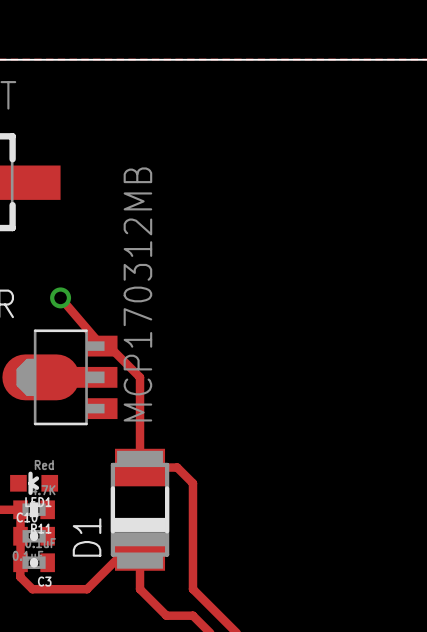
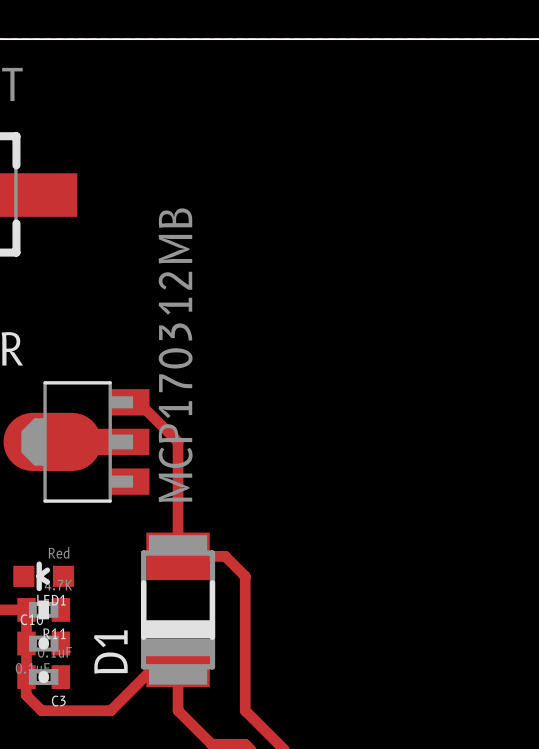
track: (60, 297) (101, 346) -> none
via: (60, 297) -> none

